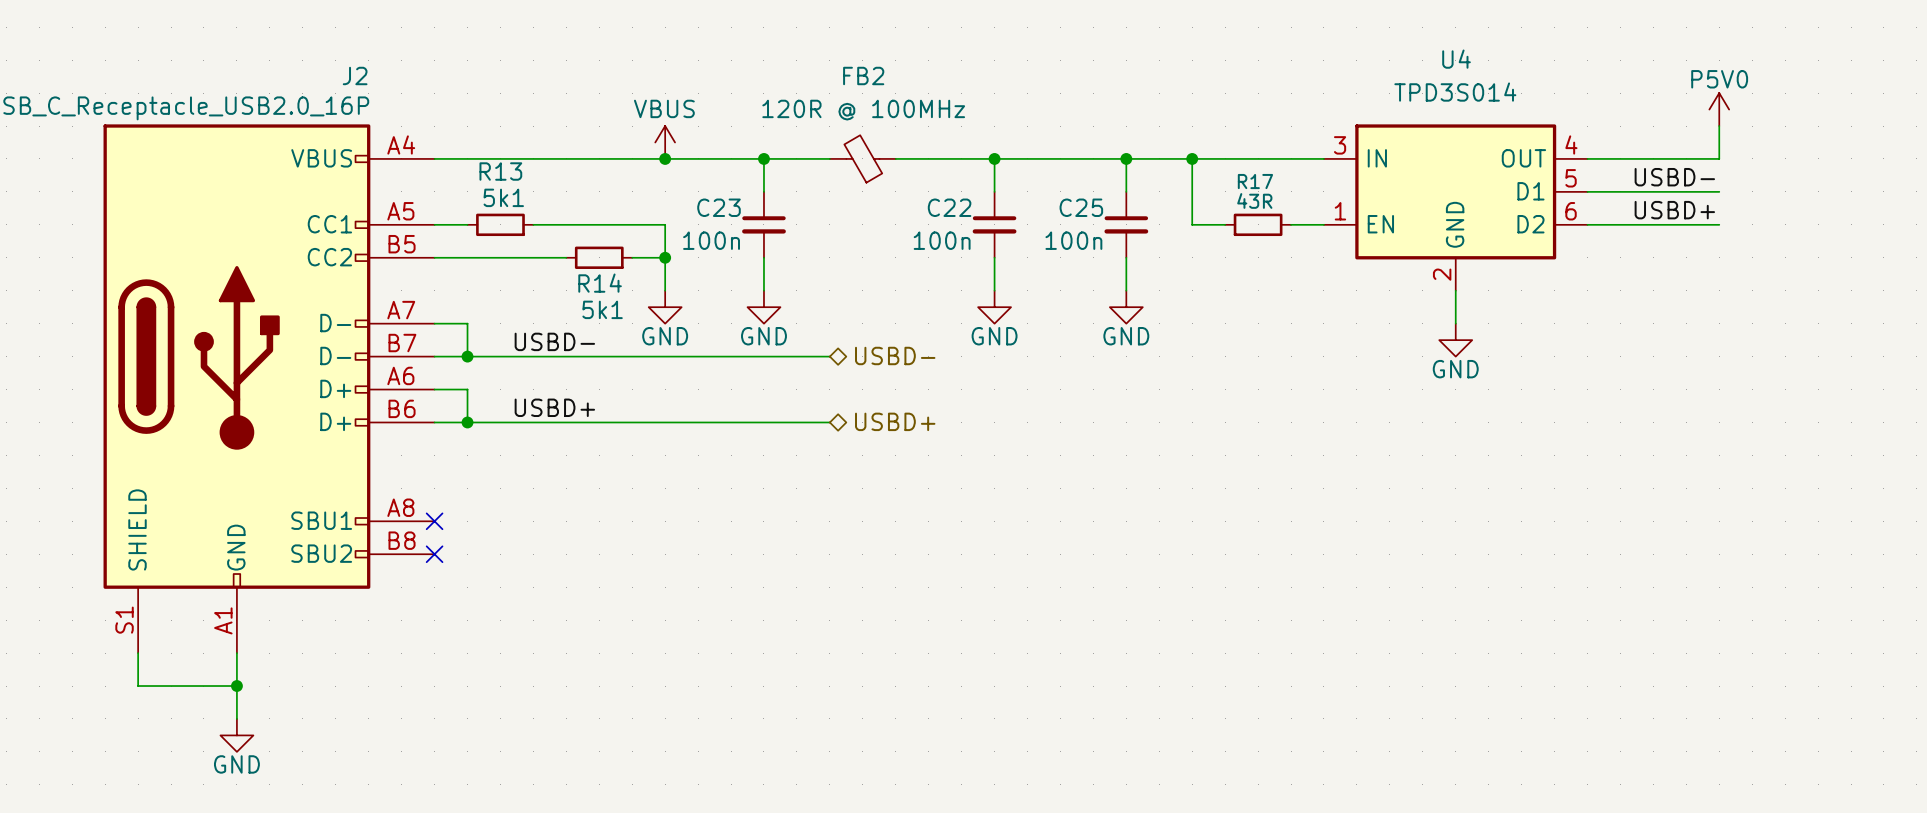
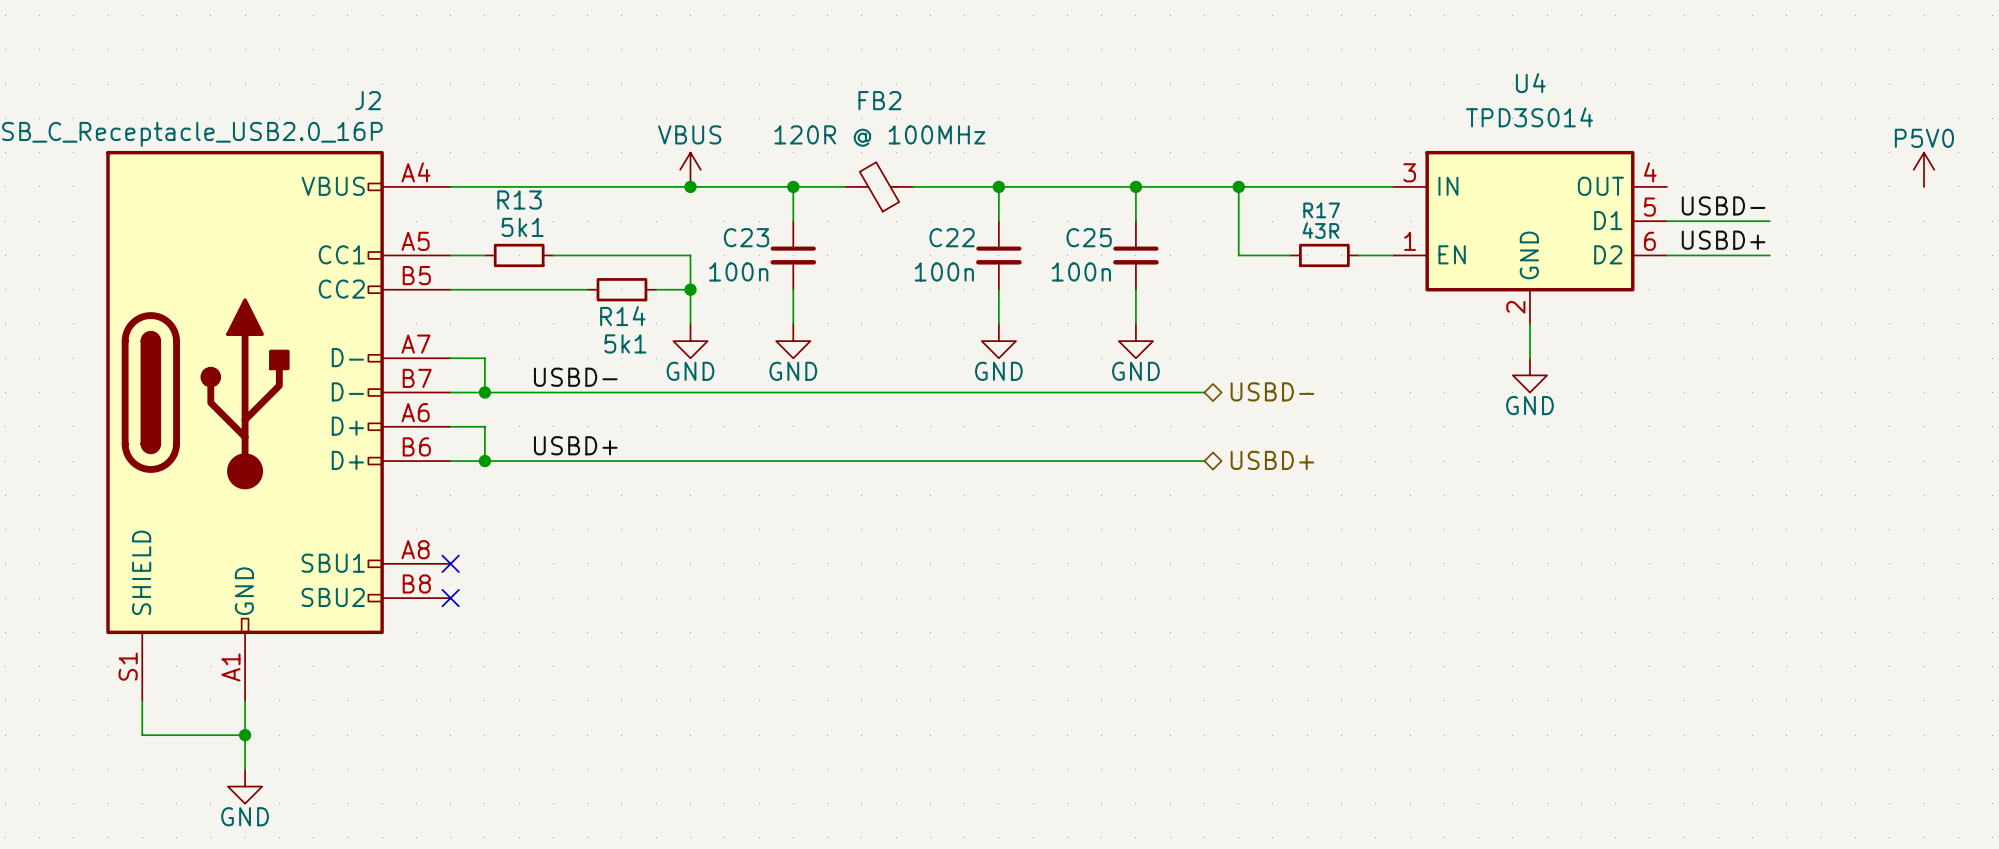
power symbol position: P5V0 (1719, 109) -> P5V0 (1924, 169)
wire: (1719, 126) (1719, 158) (1587, 158) -> none
FB2 position: (862, 158) -> (878, 186)
wire: (994, 158) (994, 191) -> (998, 186) (998, 221)
junction position: (994, 158) -> (998, 186)
wire: (1126, 158) (1126, 191) -> (1135, 186) (1135, 221)
junction position: (1126, 158) -> (1135, 186)
label position: USBD- (1674, 177) -> USBD- (1723, 205)
wire: (1702, 191) (1719, 191) -> none
U4 position: (1455, 207) -> (1529, 237)
label position: USBD+ (1674, 210) -> USBD+ (1723, 240)
C22 position: (994, 224) -> (998, 255)
C25 position: (1126, 224) -> (1135, 255)
R17 position: (1258, 224) -> (1324, 255)
wire: (1702, 224) (1719, 224) -> none
wire: (994, 257) (994, 290) -> (998, 289) (998, 323)
wire: (1126, 257) (1126, 290) -> (1135, 289) (1135, 323)
wire: (1455, 290) (1455, 323) -> (1529, 323) (1529, 358)
power symbol position: GND (994, 307) -> GND (998, 341)
power symbol position: GND (1126, 307) -> GND (1135, 341)
power symbol position: GND (1455, 340) -> GND (1529, 375)
hierarchical label: USBD- (895, 355) -> none
hierarchical label: none -> USBD- (1272, 391)
wire: none -> (861, 392) (1204, 392)
hierarchical label: USBD+ (895, 421) -> none
hierarchical label: none -> USBD+ (1272, 460)
wire: none -> (861, 461) (1204, 461)

